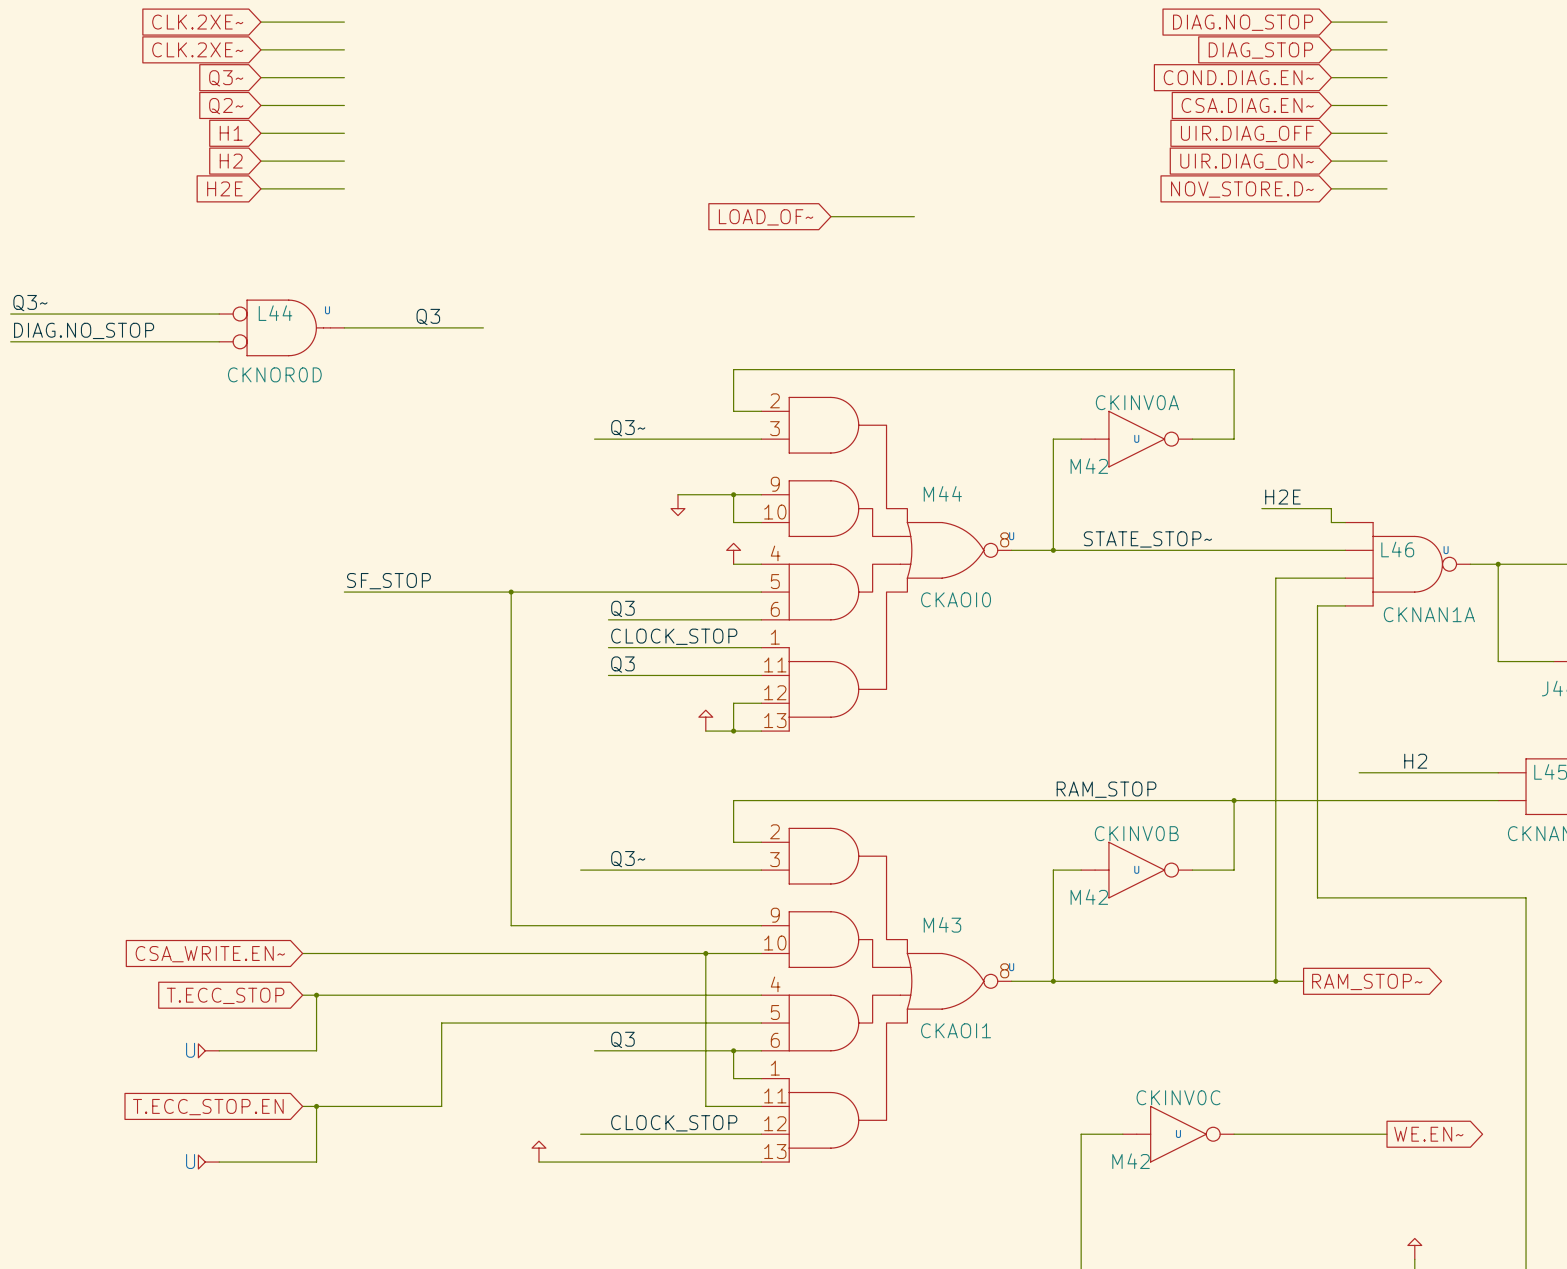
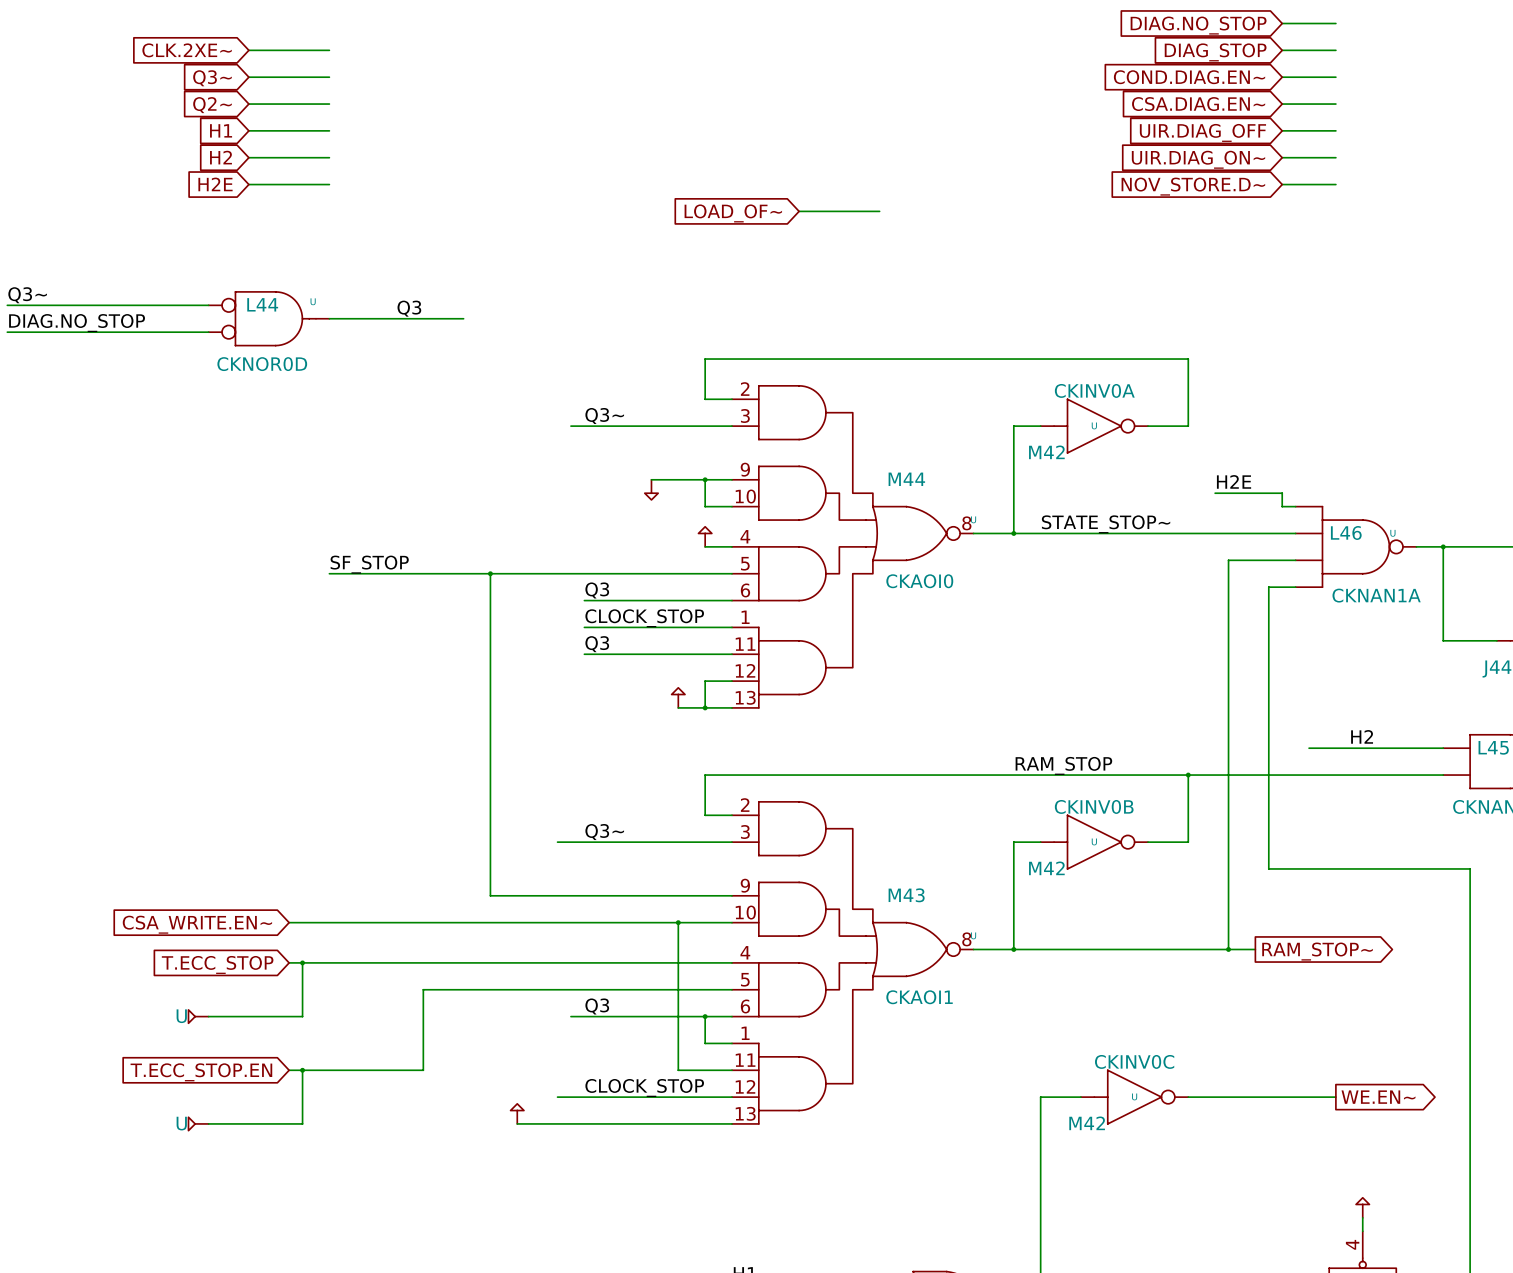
global label: CLK.2XE~ (197, 22) -> none
wire: (260, 22) (344, 22) -> none

